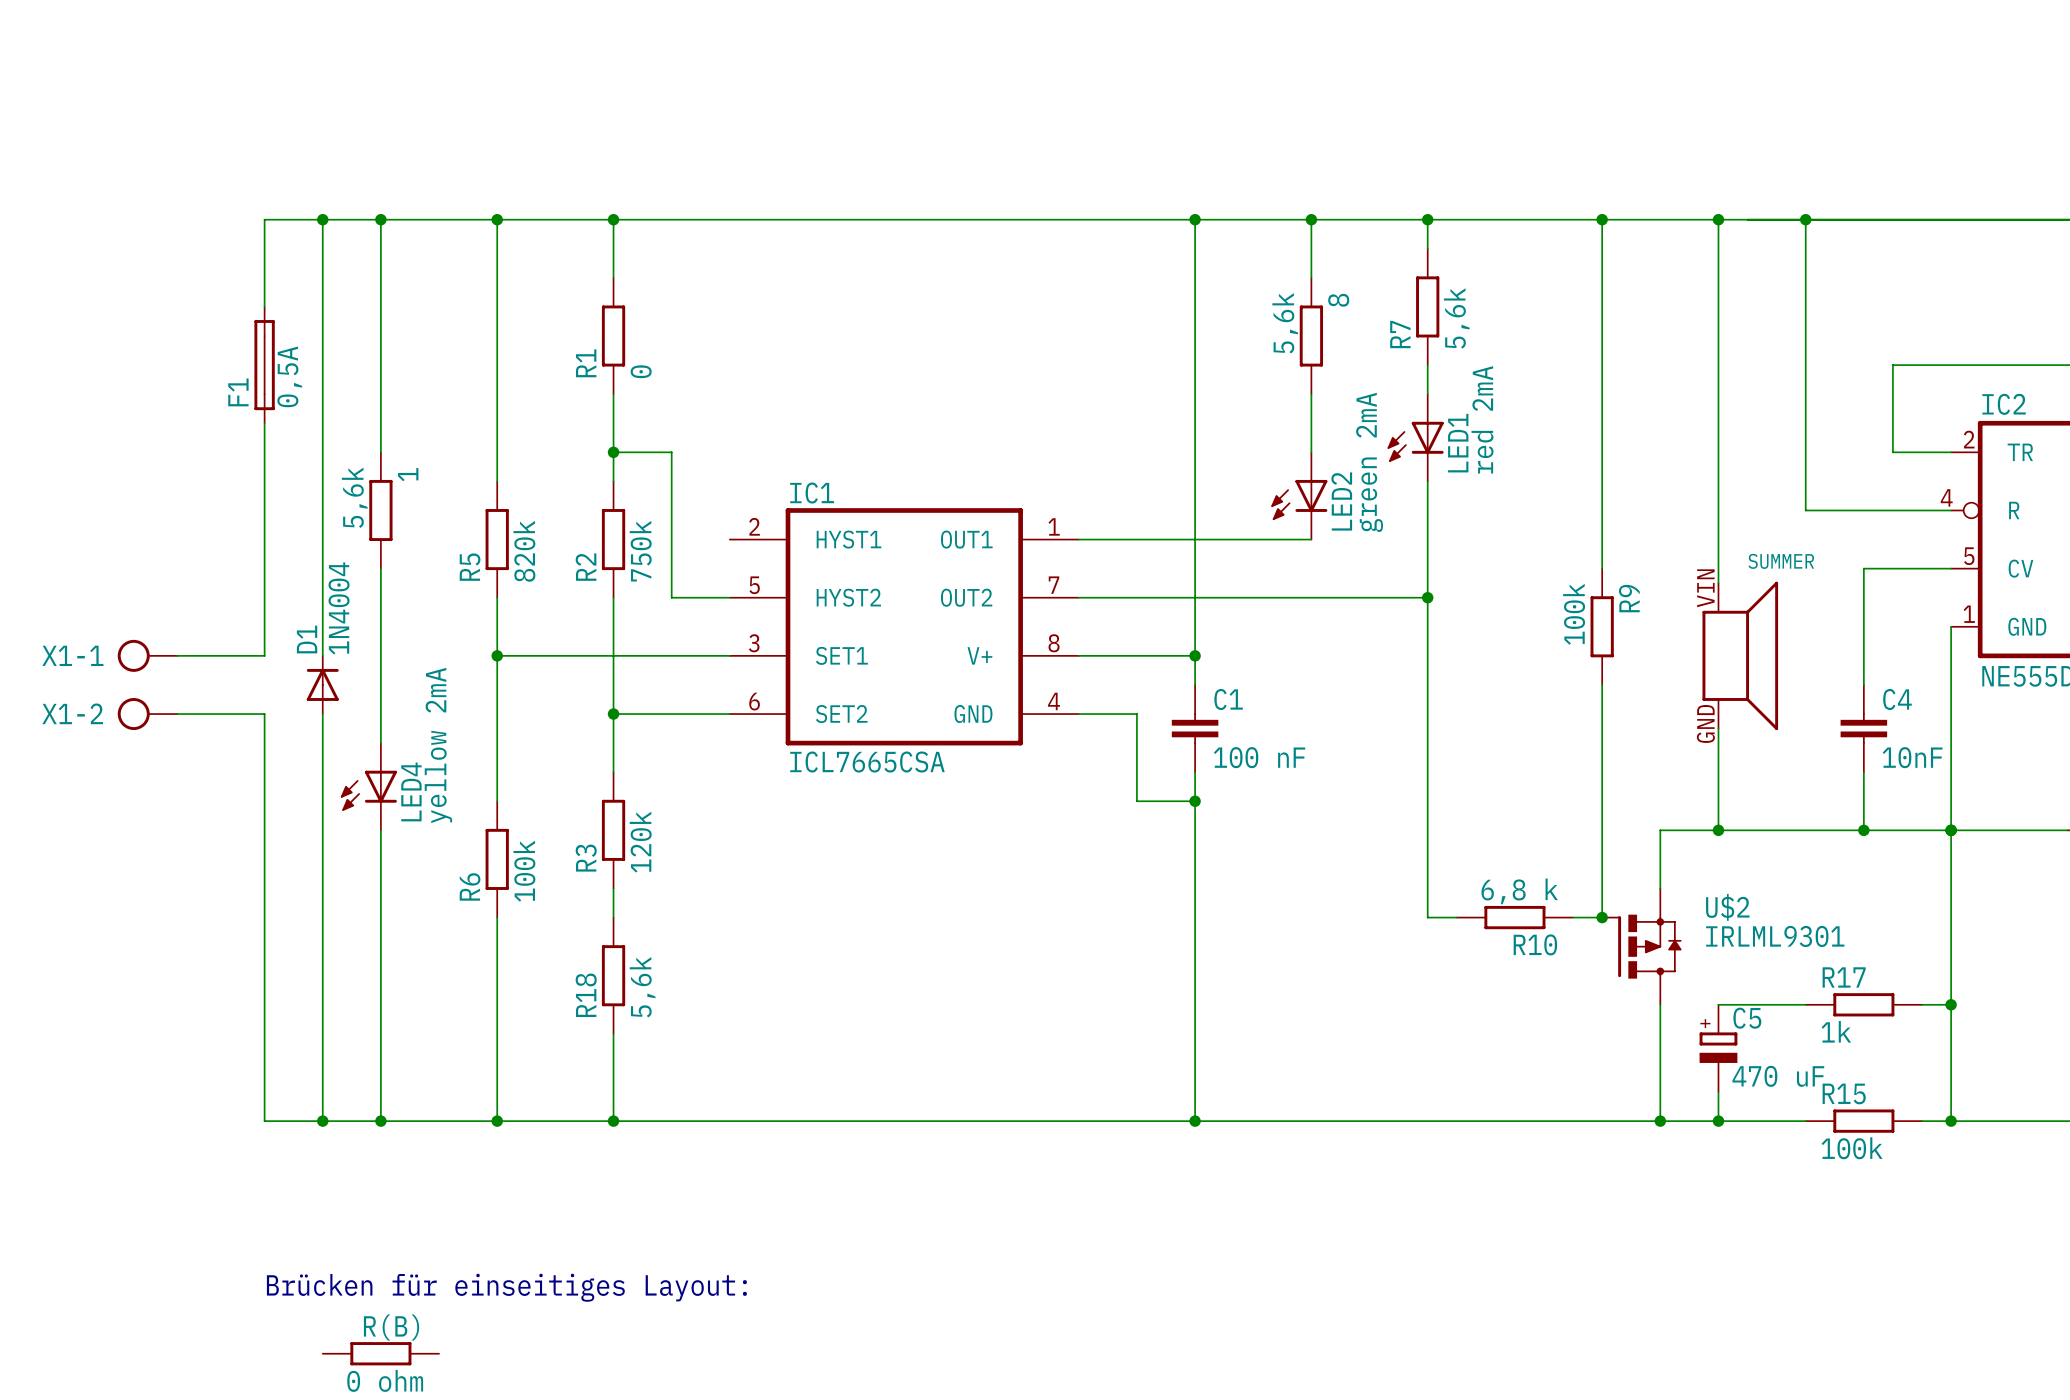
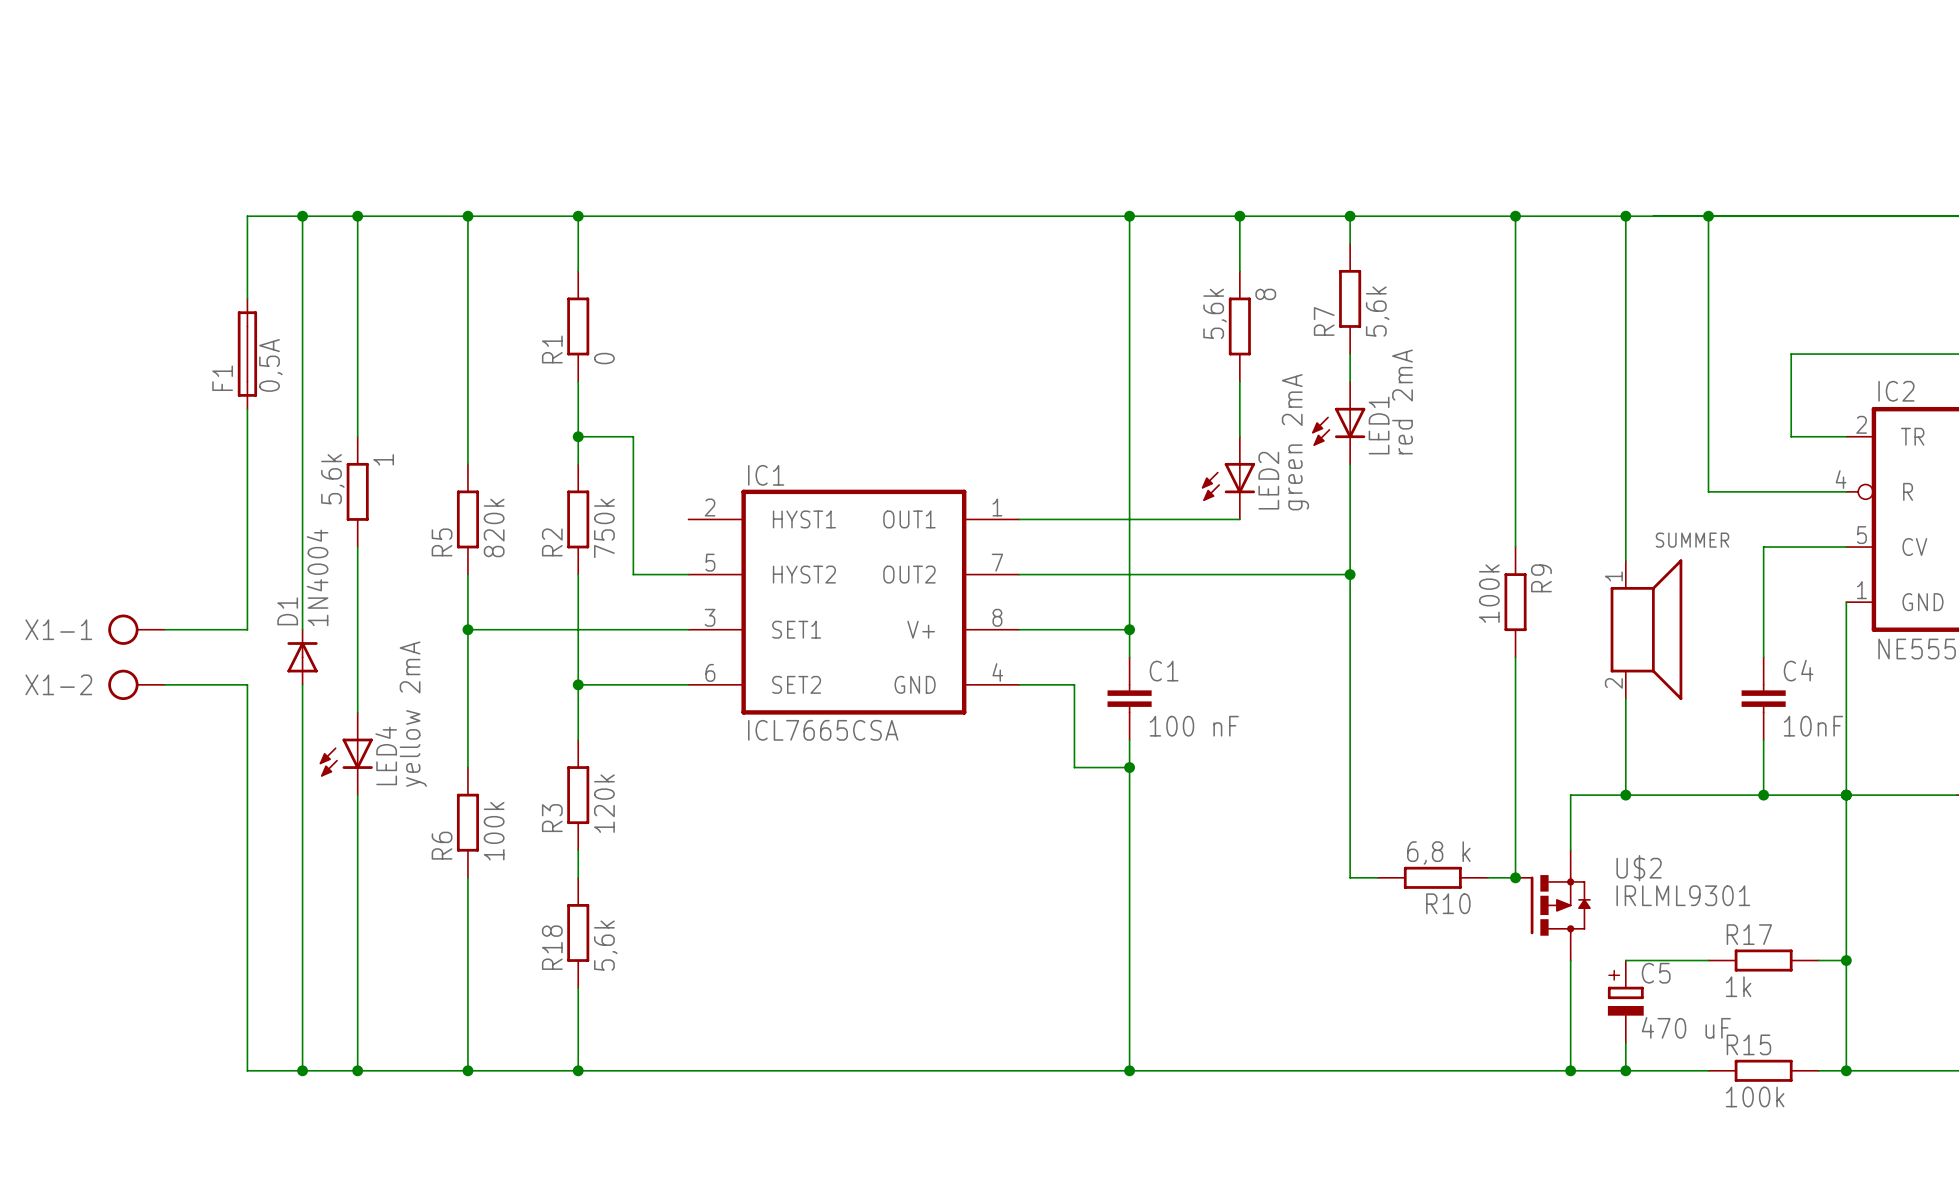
SUMMER pin number: VIN (1705, 588) -> 1 (1613, 576)
SUMMER pin number: GND (1705, 723) -> 2 (1613, 683)

